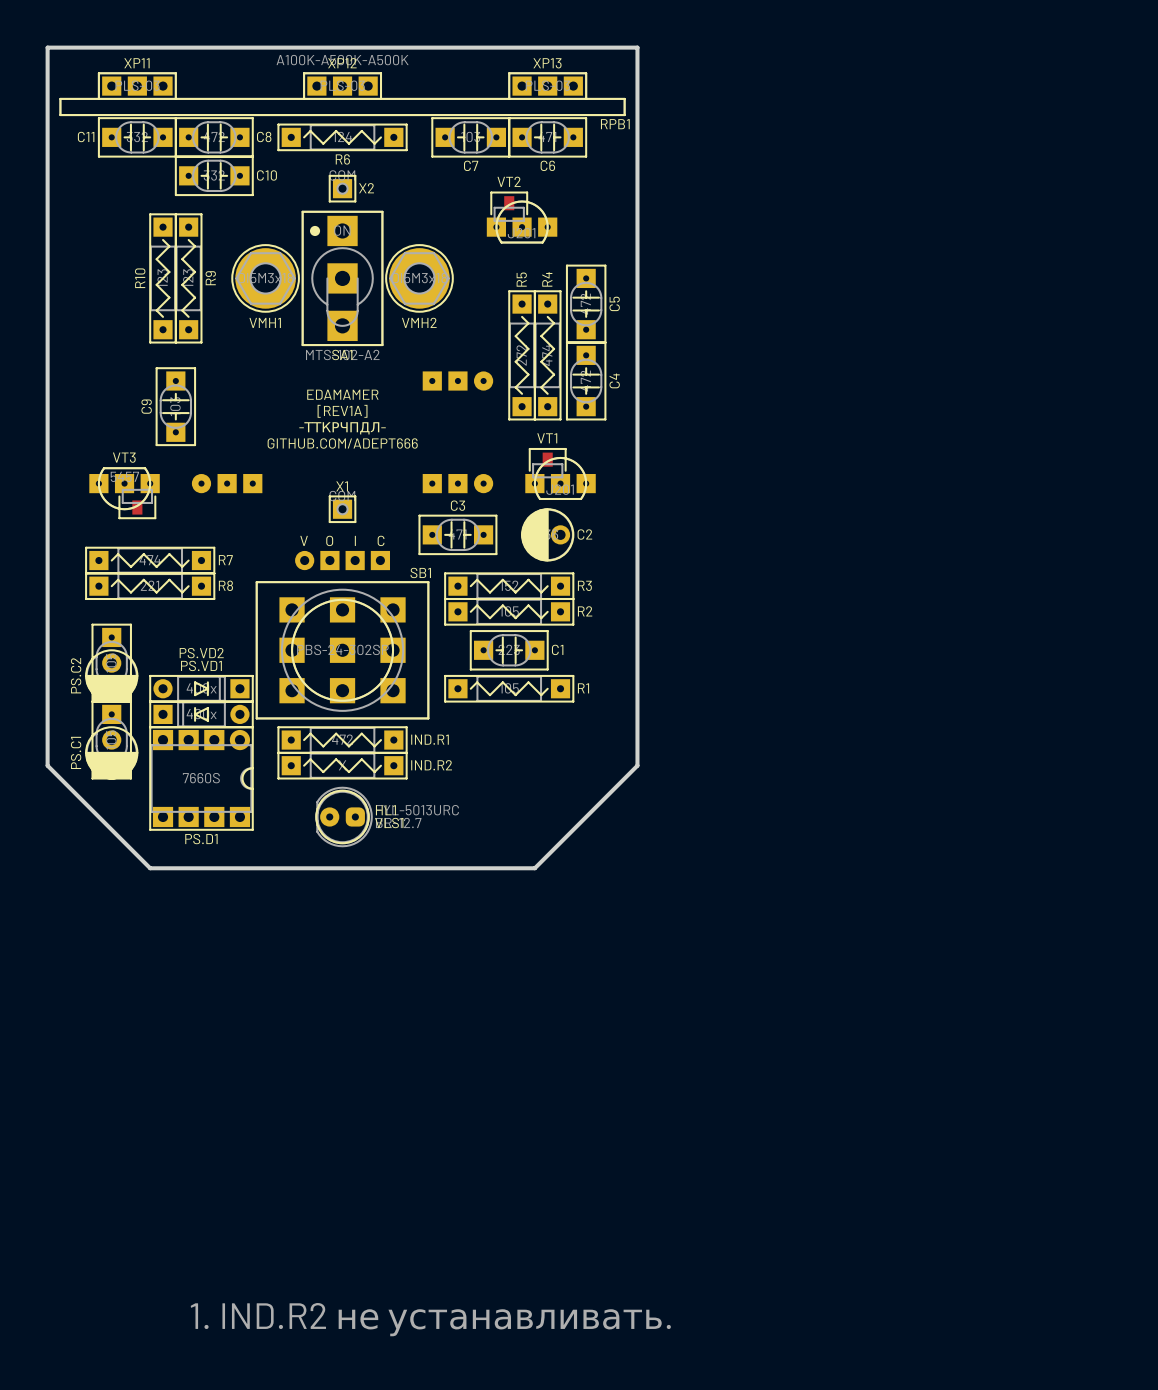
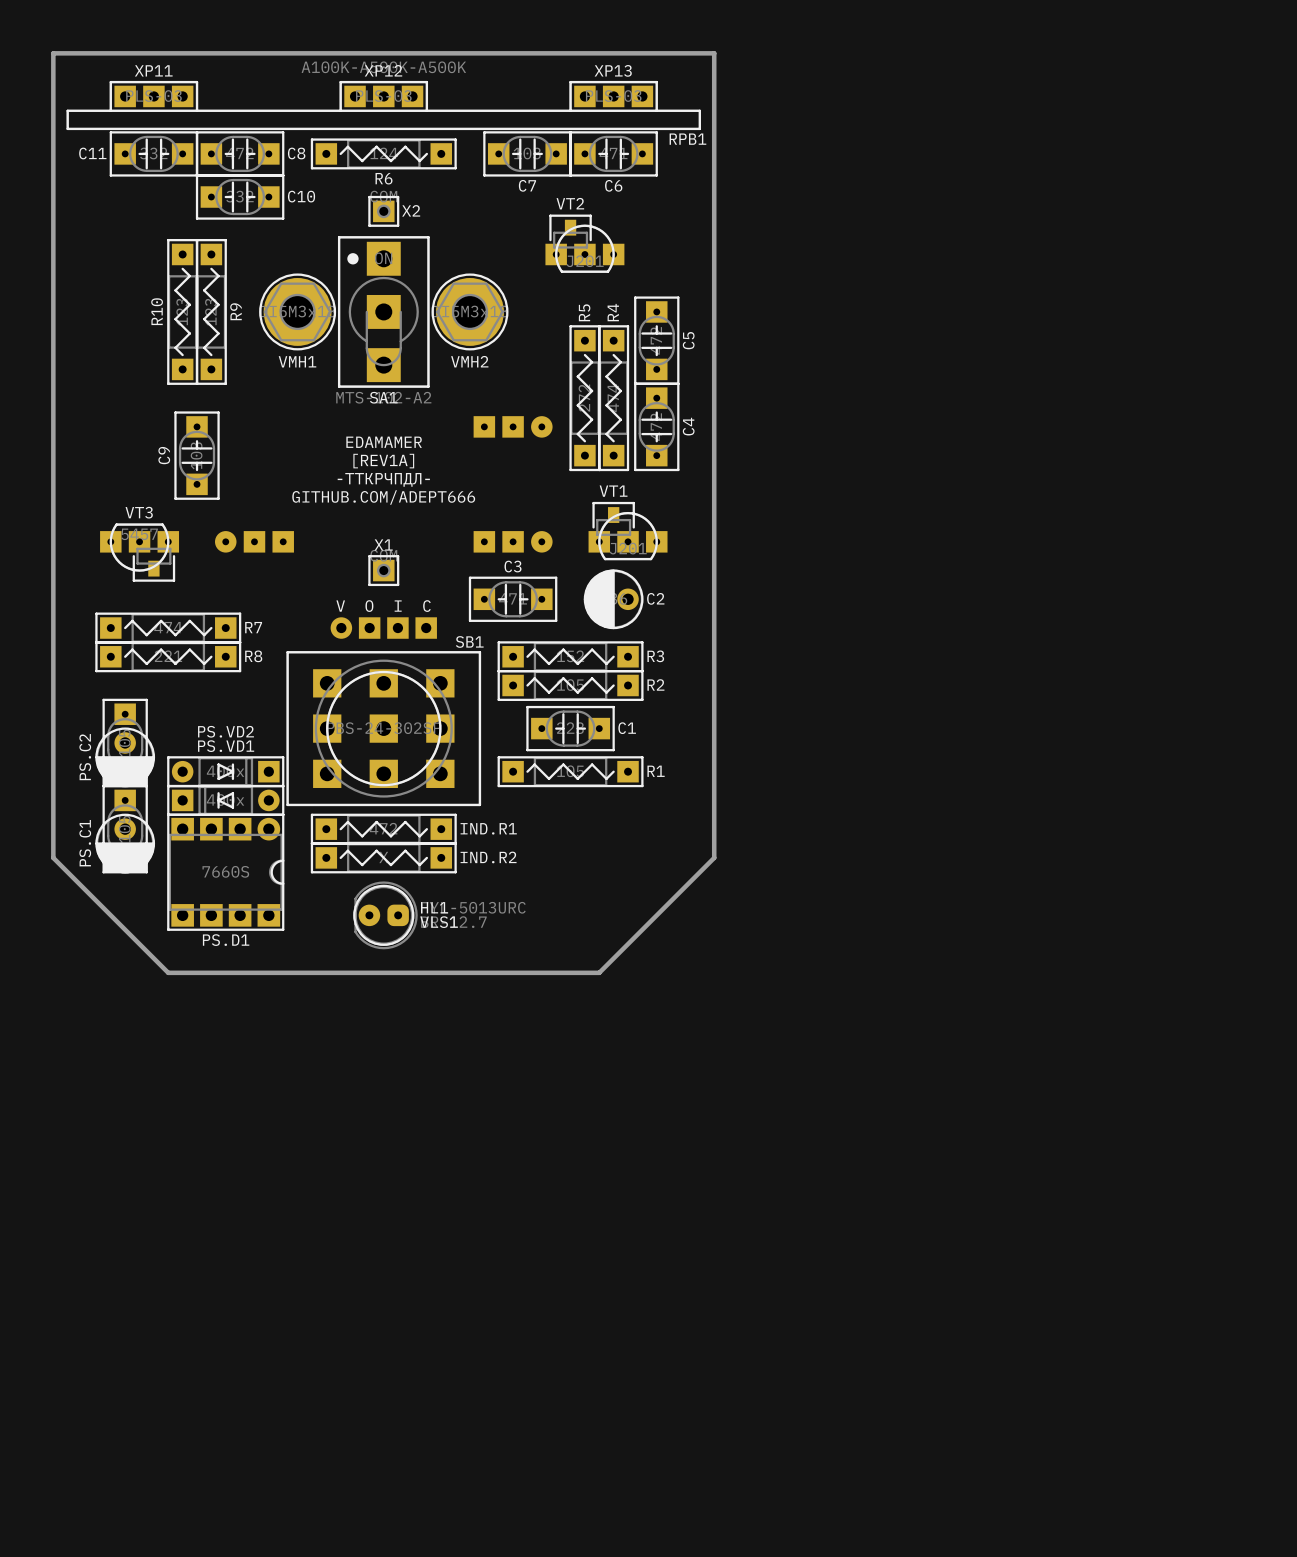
text: 1. IND.R2 не устанавливать. (430, 1319) -> none

